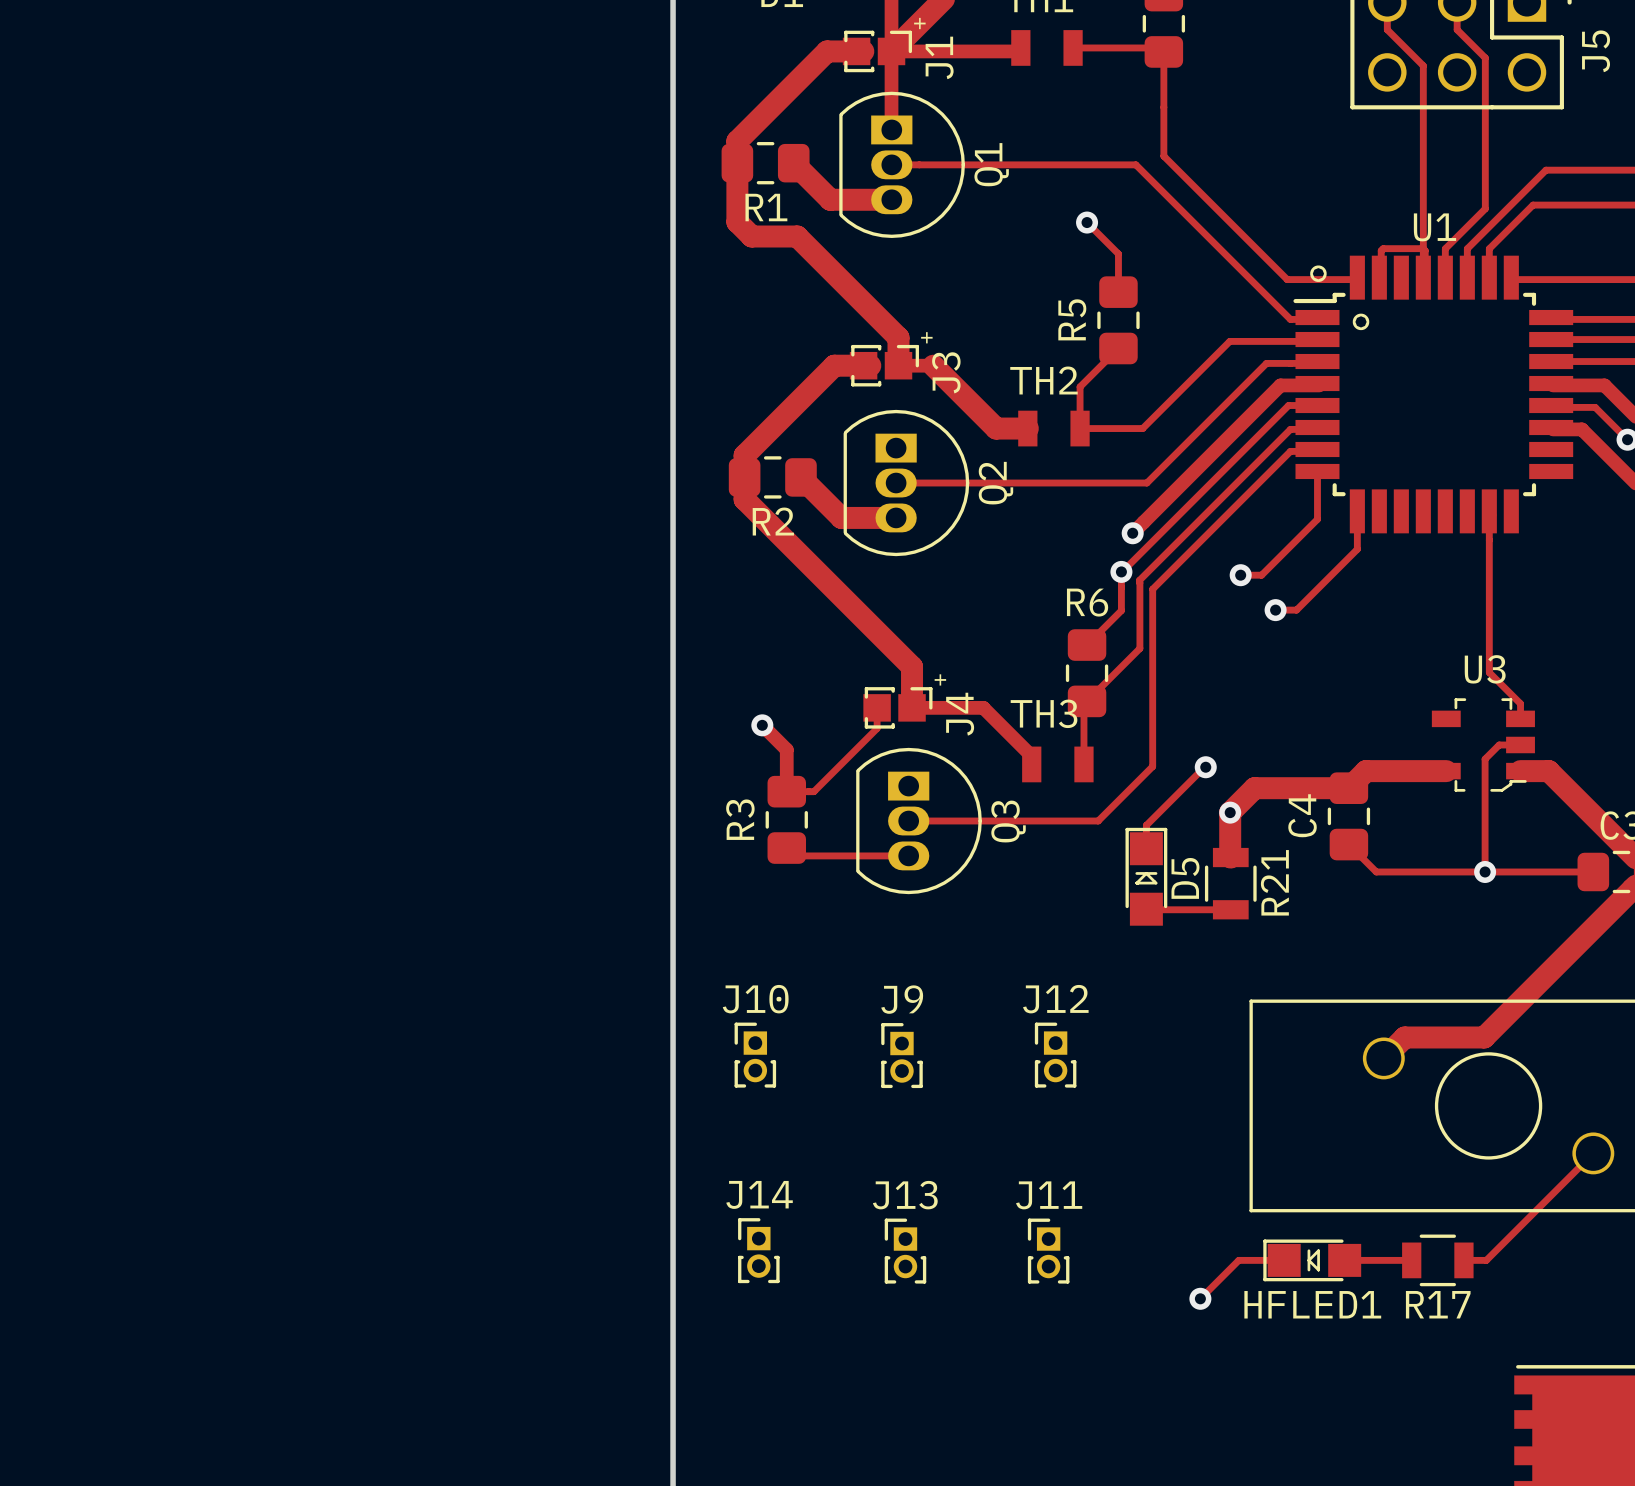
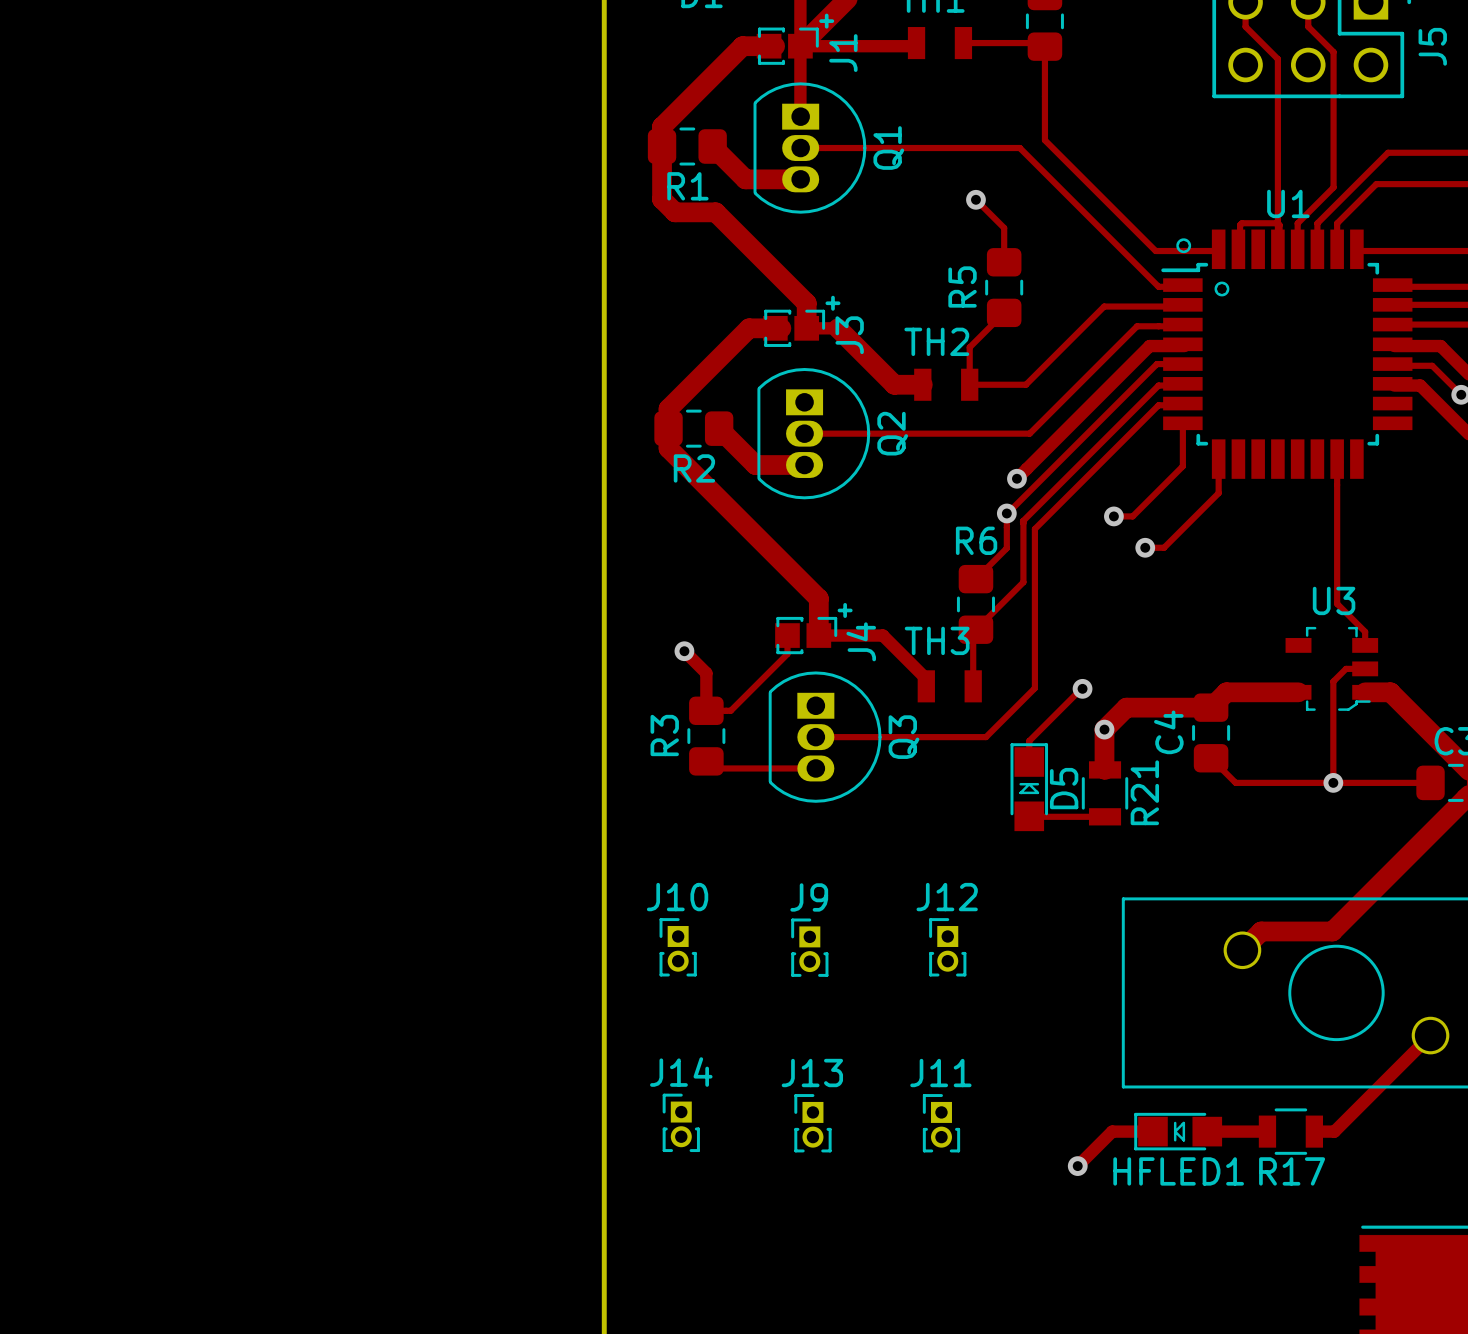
track width: thin (1593, 1153) (1486, 1260) (1463, 1260) -> thick (1430, 1035) (1334, 1131) (1314, 1131)
track width: thin (1284, 1260) (1238, 1260) (1200, 1298) -> thick (1152, 1131) (1112, 1131) (1077, 1166)
track width: thin (1344, 1260) (1411, 1260) -> thick (1207, 1131) (1267, 1131)

